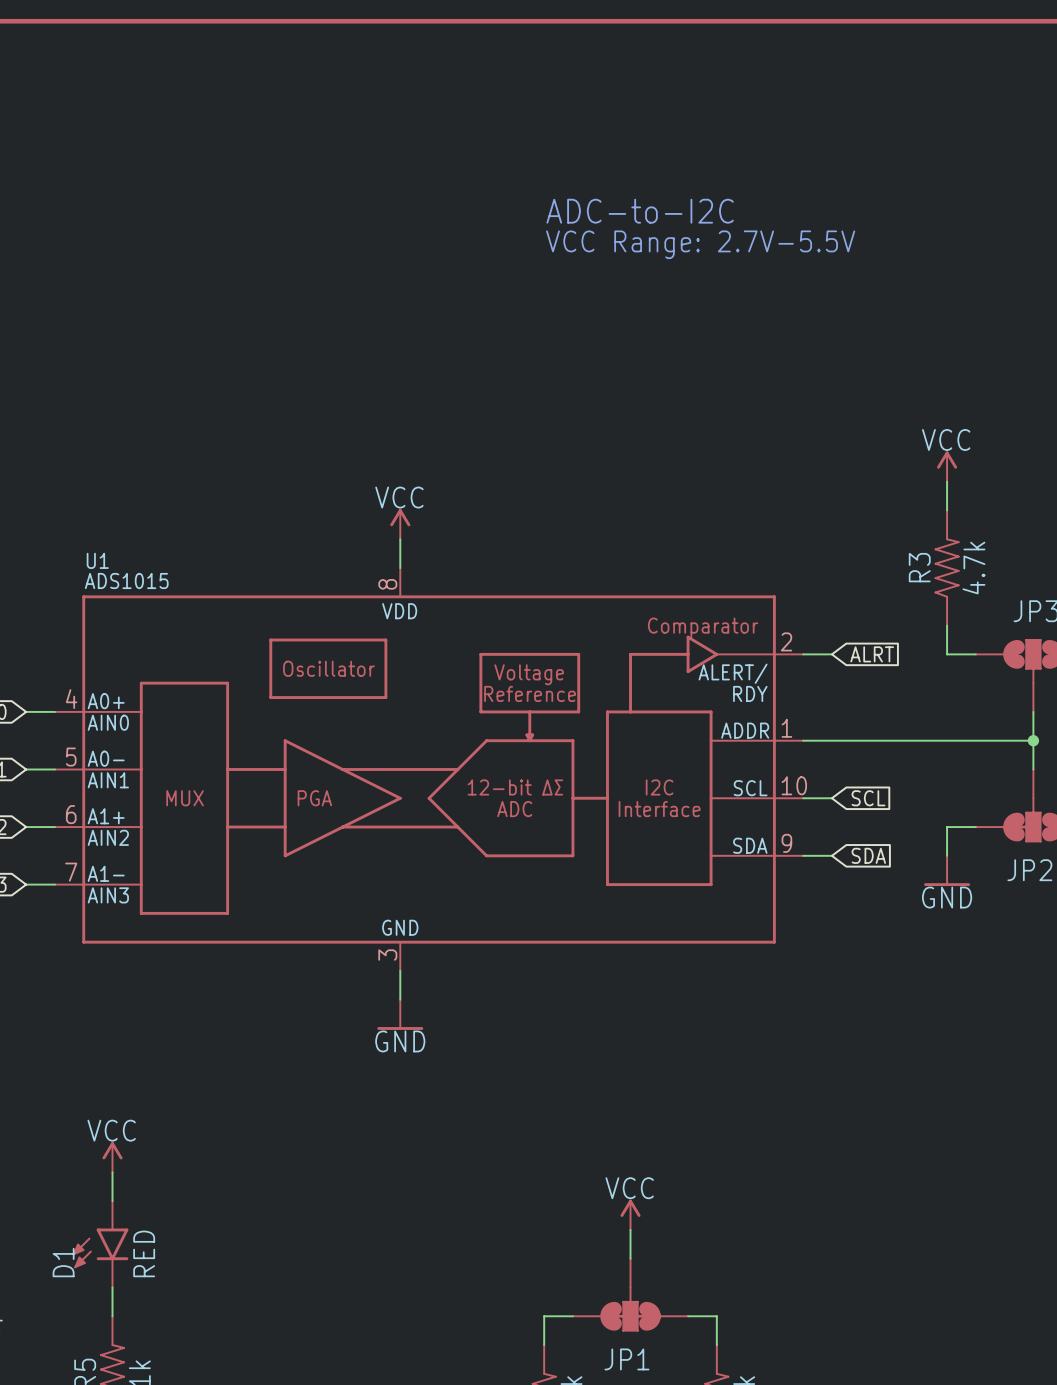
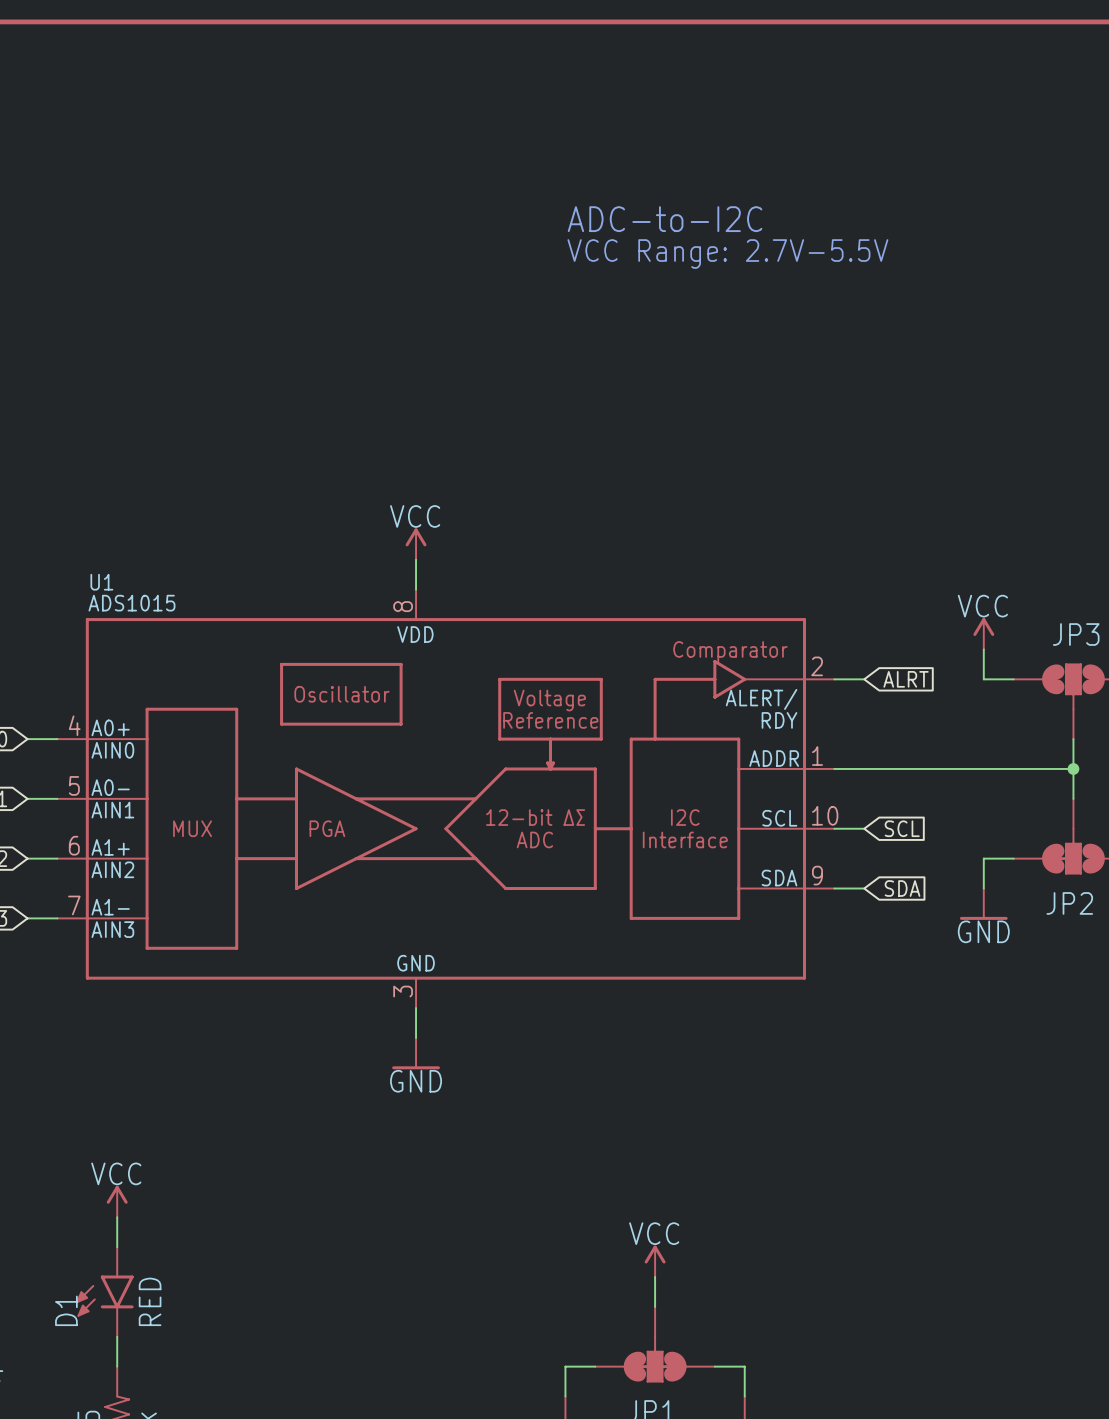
power symbol position: VCC (947, 466) -> VCC (983, 633)
wire: (947, 481) (947, 510) -> none
R3: 4.7k (947, 568) -> none

